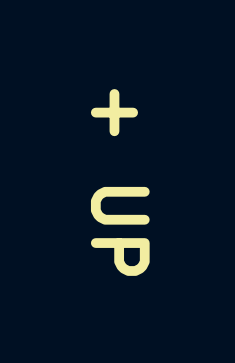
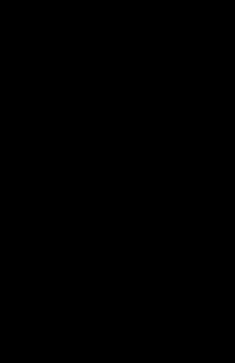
text: + UP (120, 182) -> none

